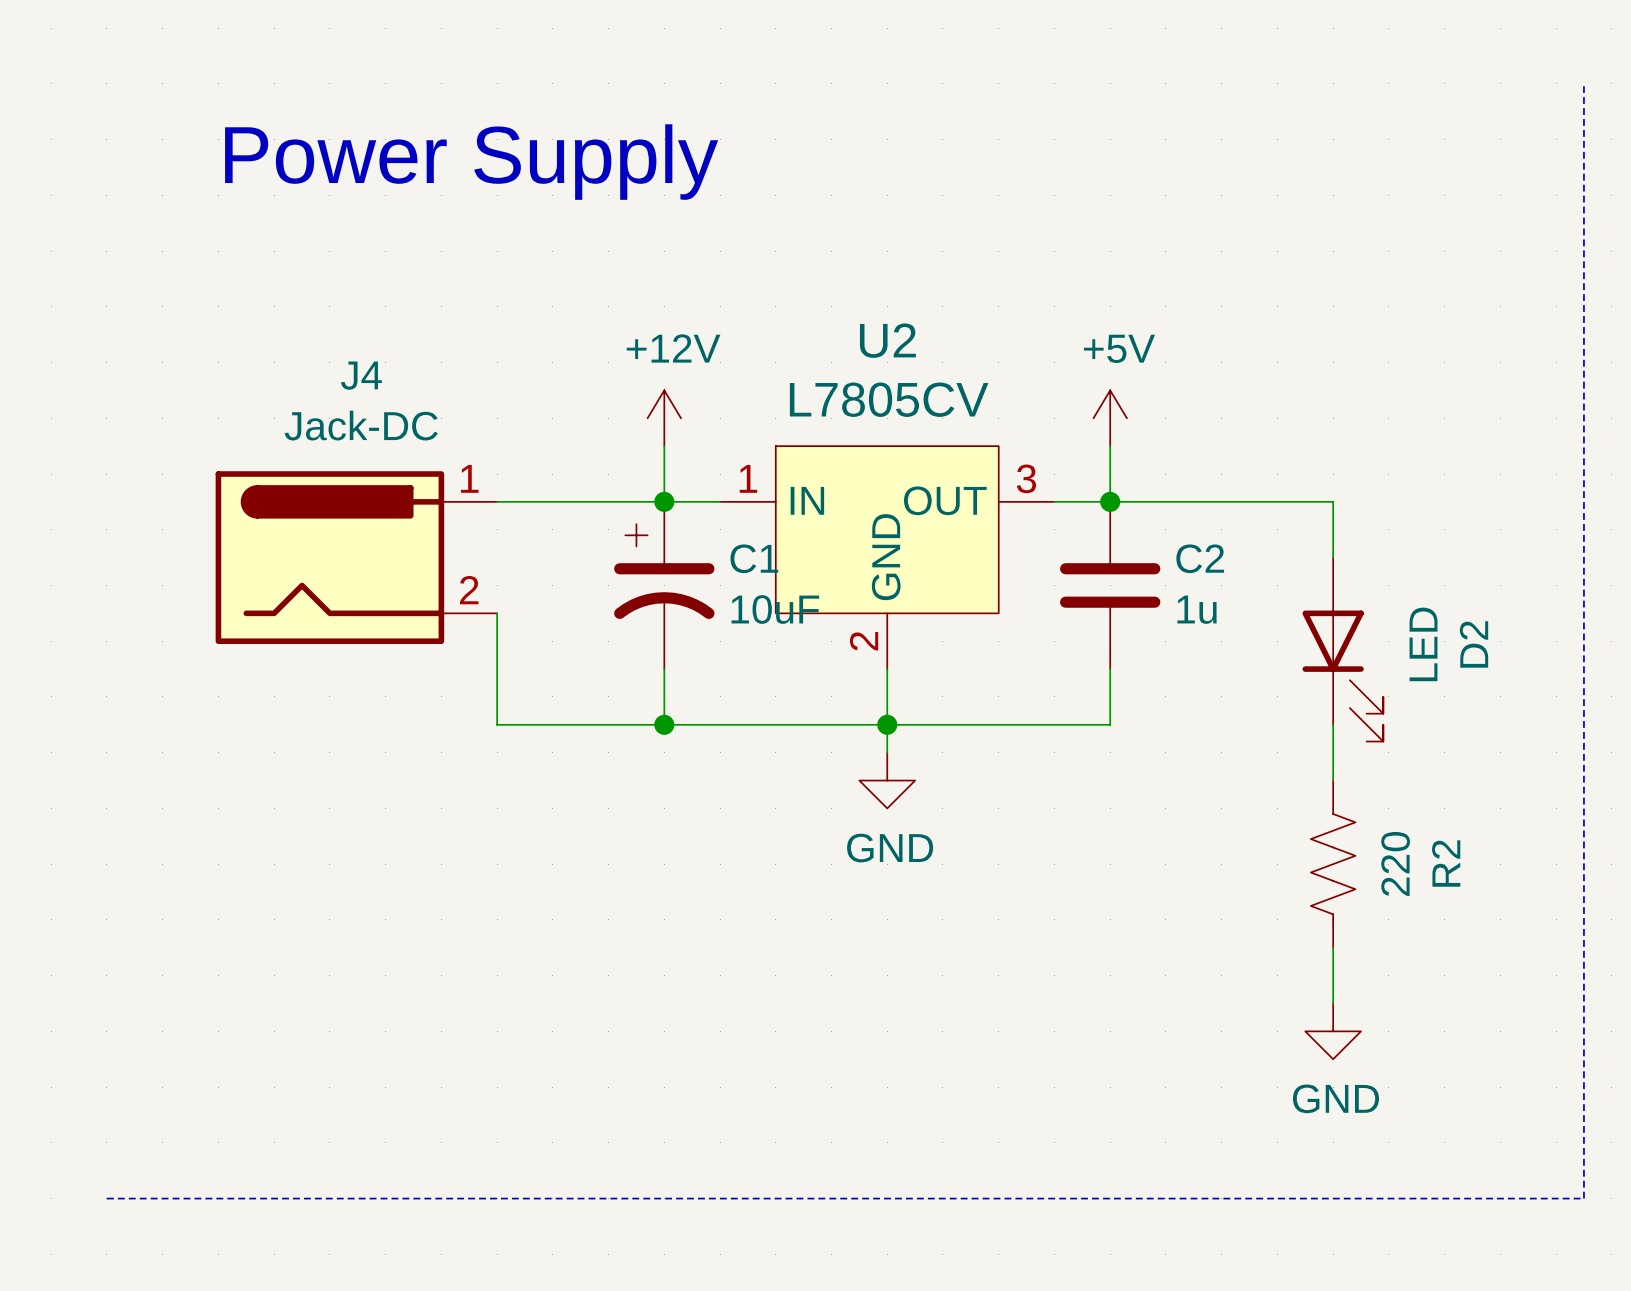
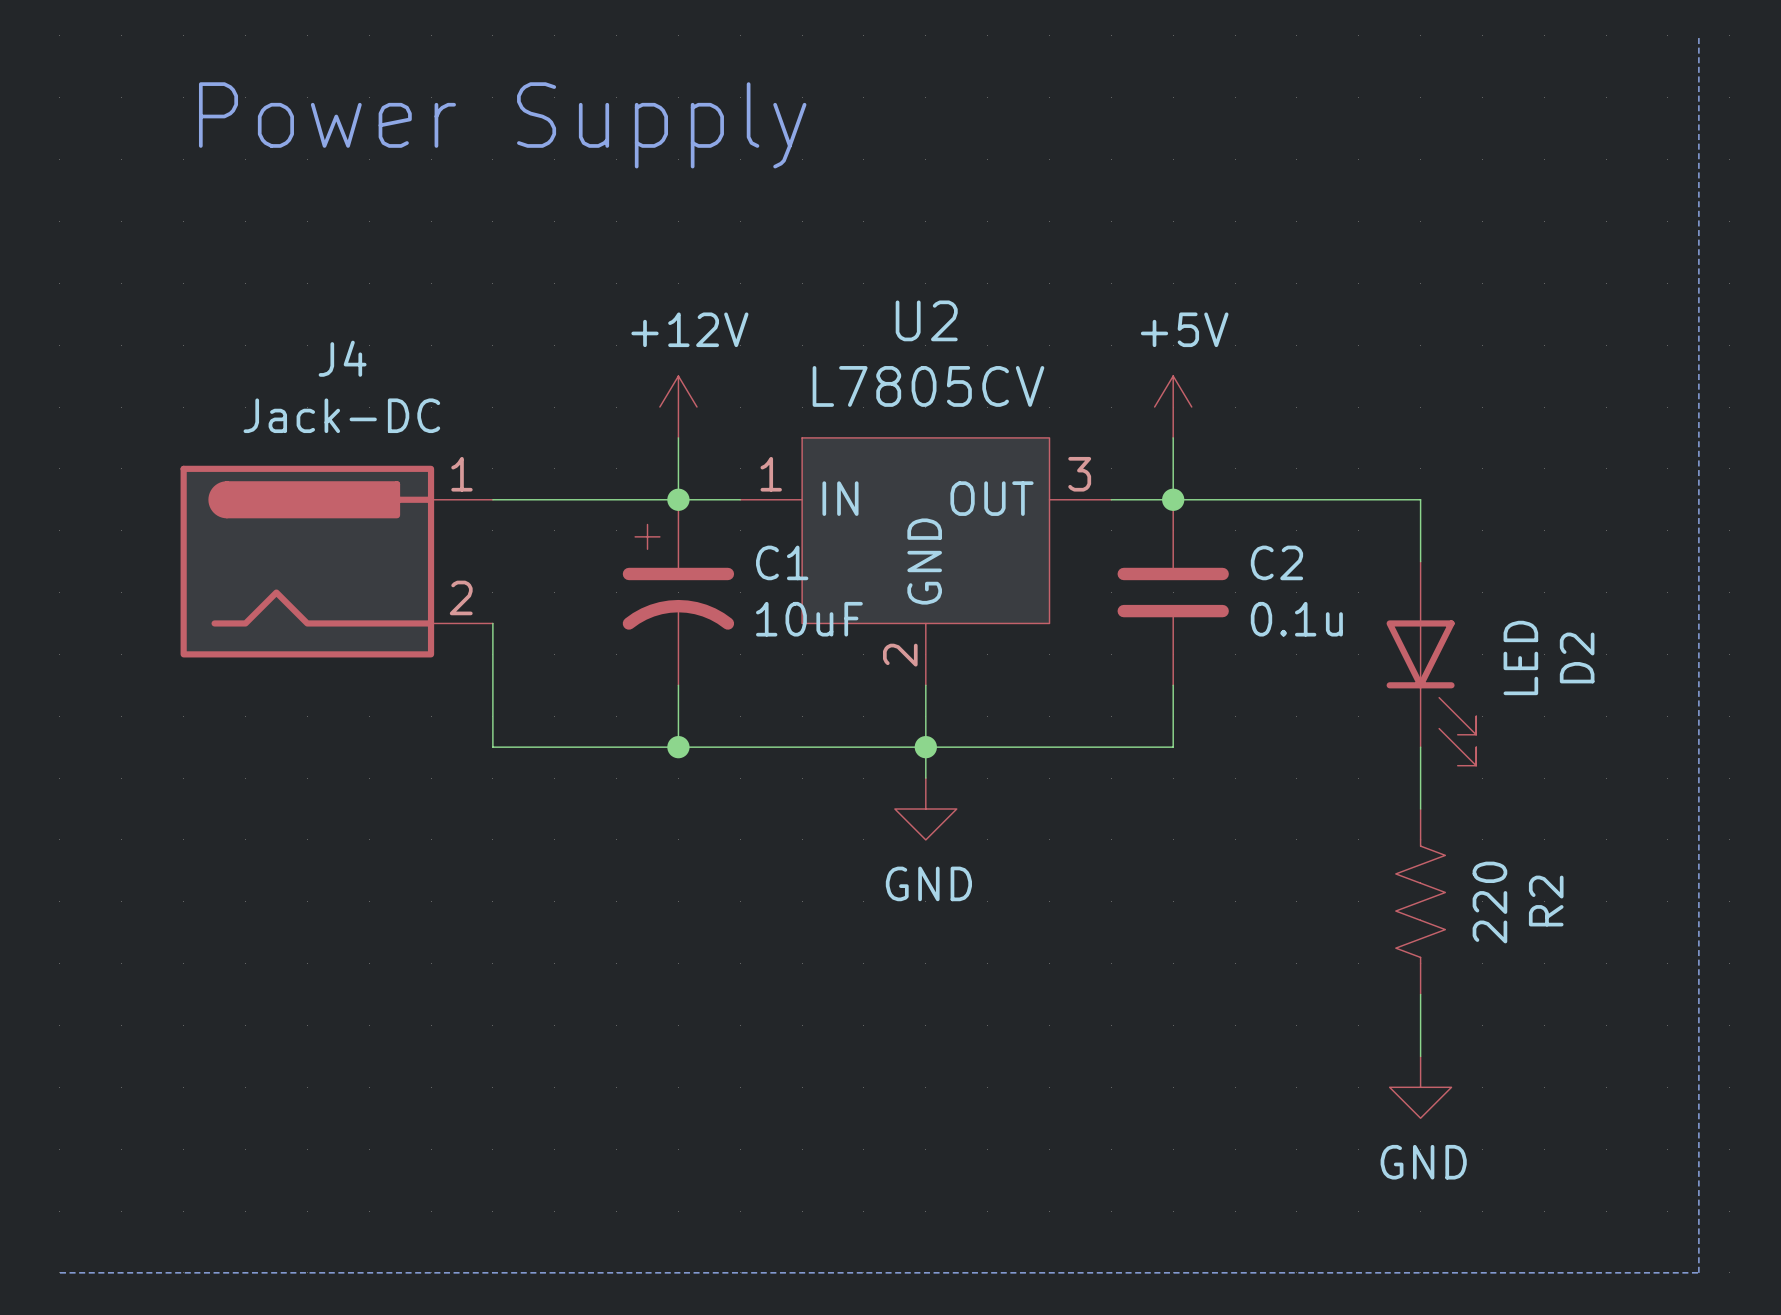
C2 value: 1u (1197, 609) -> 0.1u (1296, 619)

